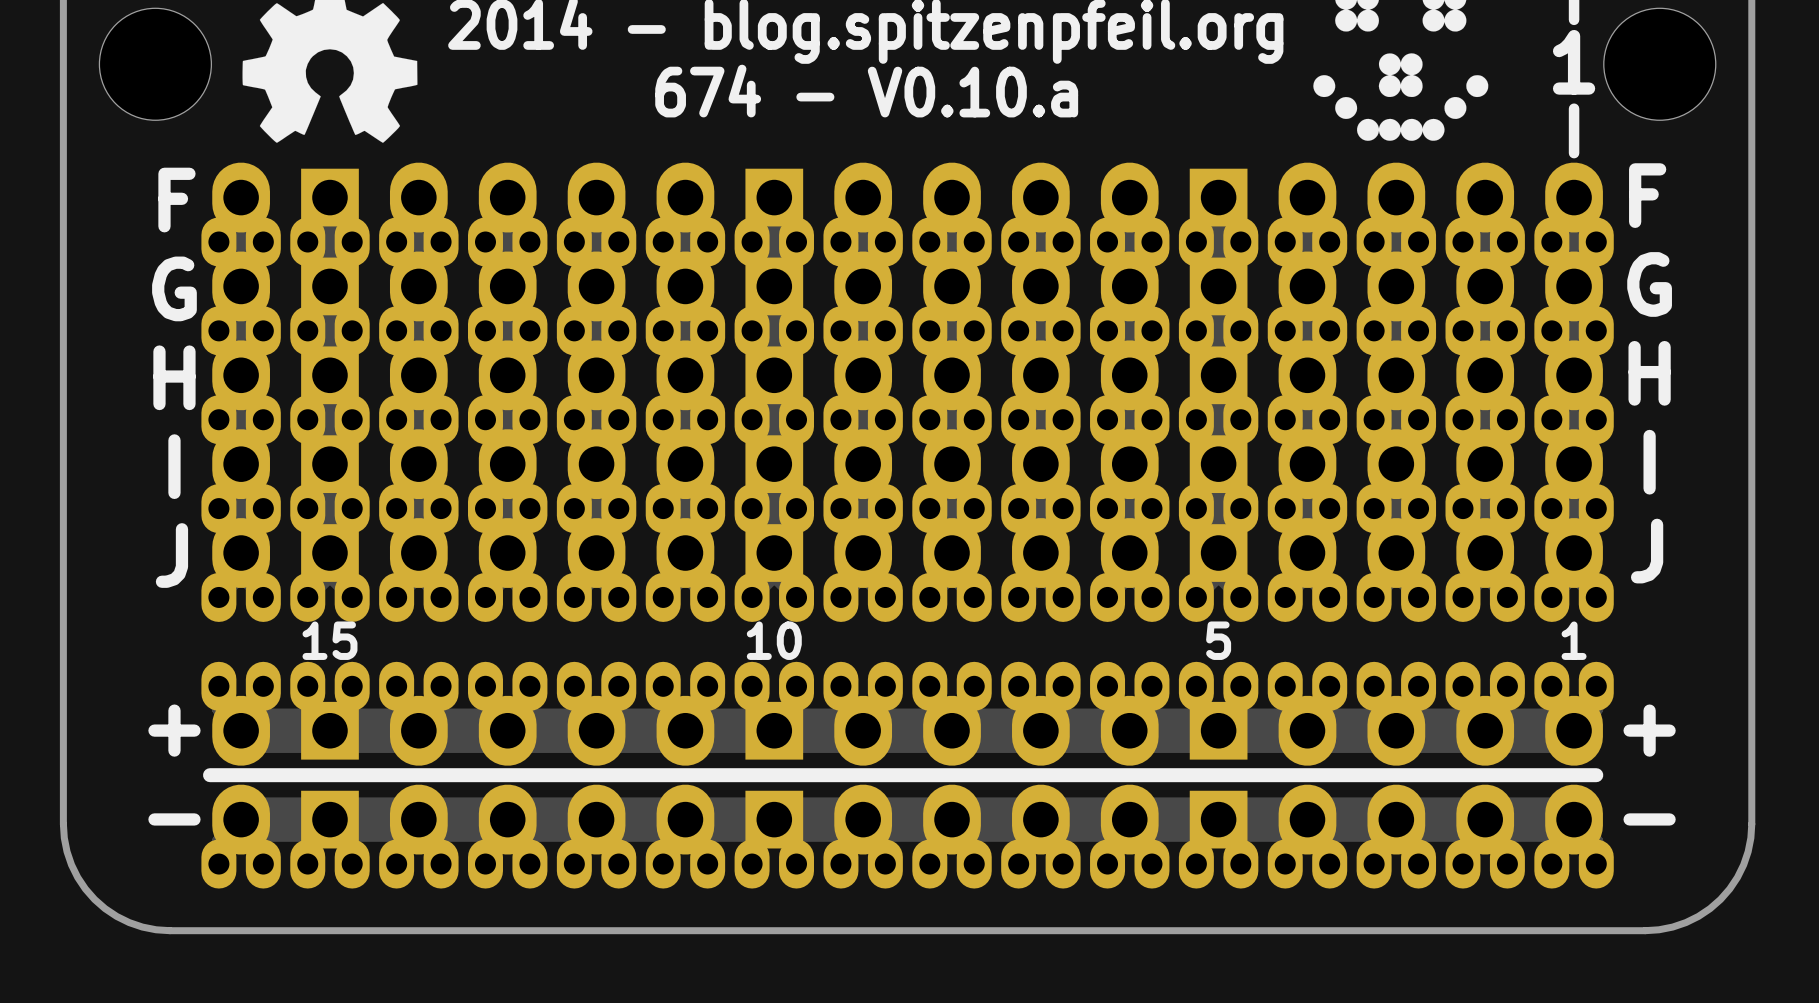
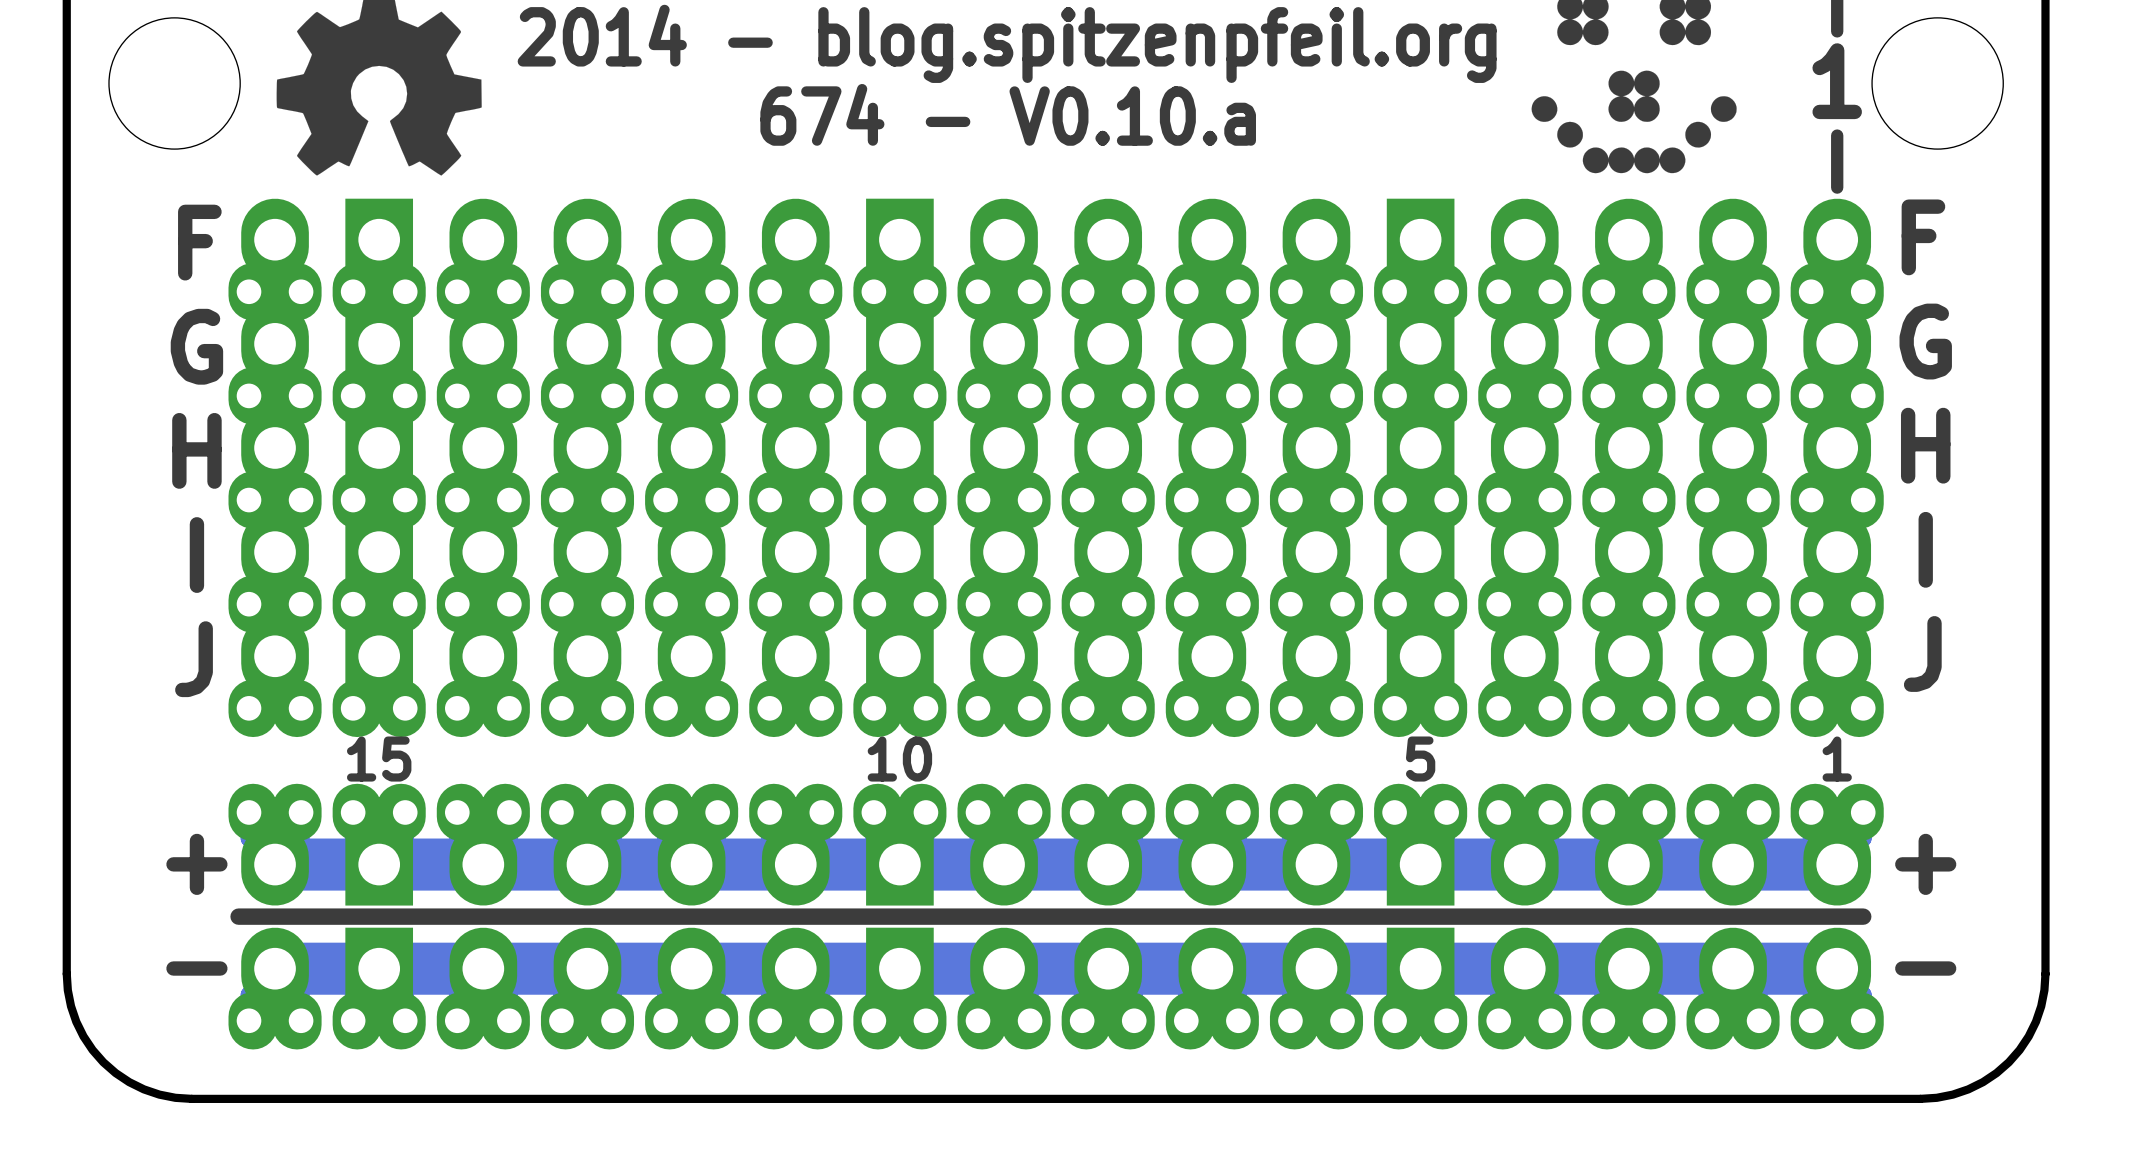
part footprint: [212, 162, 893, 233] -> [241, 198, 1038, 281]
part footprint: [923, 162, 1603, 233] -> [1074, 198, 1872, 281]
part footprint: [201, 217, 548, 267] -> [228, 263, 635, 321]
part footprint: [556, 217, 903, 267] -> [645, 263, 1051, 321]
part footprint: [912, 217, 1259, 267] -> [1061, 263, 1468, 321]
part footprint: [1267, 217, 1614, 267] -> [1478, 263, 1884, 321]
part footprint: [212, 251, 893, 322] -> [241, 302, 1038, 385]
part footprint: [923, 251, 1603, 322] -> [1074, 302, 1872, 385]
part footprint: [201, 306, 548, 356] -> [228, 367, 635, 425]
part footprint: [556, 306, 903, 356] -> [645, 367, 1051, 425]
part footprint: [912, 306, 1259, 356] -> [1061, 367, 1468, 425]
part footprint: [1267, 306, 1614, 356] -> [1478, 367, 1884, 425]
part footprint: [212, 340, 893, 411] -> [241, 406, 1038, 489]
part footprint: [923, 340, 1603, 411] -> [1074, 406, 1872, 489]
part footprint: [201, 395, 548, 445] -> [228, 471, 635, 529]
part footprint: [556, 395, 903, 445] -> [645, 471, 1051, 529]
part footprint: [912, 395, 1259, 445] -> [1061, 471, 1468, 529]
part footprint: [1267, 395, 1614, 445] -> [1478, 471, 1884, 529]
part footprint: [212, 429, 893, 500] -> [241, 511, 1038, 594]
part footprint: [923, 429, 1603, 500] -> [1074, 511, 1872, 594]
part footprint: [201, 484, 548, 534] -> [228, 575, 635, 633]
part footprint: [556, 484, 903, 534] -> [645, 575, 1051, 633]
part footprint: [912, 484, 1259, 534] -> [1061, 575, 1468, 633]
part footprint: [1267, 484, 1614, 534] -> [1478, 575, 1884, 633]
part footprint: [212, 518, 893, 589] -> [241, 615, 1038, 698]
part footprint: [923, 518, 1603, 589] -> [1074, 615, 1872, 698]
part footprint: [201, 572, 548, 622] -> [228, 679, 635, 738]
part footprint: [556, 572, 903, 622] -> [645, 679, 1051, 738]
part footprint: [912, 572, 1259, 622] -> [1061, 679, 1468, 738]
part footprint: [1267, 572, 1614, 622] -> [1478, 679, 1884, 738]
part footprint: [201, 661, 548, 711] -> [228, 783, 635, 842]
part footprint: [556, 661, 903, 711] -> [645, 783, 1051, 842]
part footprint: [912, 661, 1259, 711] -> [1061, 783, 1468, 842]
part footprint: [1267, 661, 1614, 711] -> [1478, 783, 1884, 842]
part footprint: [212, 695, 893, 766] -> [241, 823, 1038, 906]
part footprint: [923, 695, 1603, 766] -> [1074, 823, 1872, 906]
part footprint: [212, 784, 893, 855] -> [241, 927, 1038, 1010]
part footprint: [923, 784, 1603, 855] -> [1074, 927, 1872, 1010]
part footprint: [201, 839, 548, 889] -> [228, 992, 635, 1050]
part footprint: [556, 839, 903, 889] -> [645, 992, 1051, 1050]
part footprint: [912, 839, 1259, 889] -> [1061, 992, 1468, 1050]
part footprint: [1267, 839, 1614, 889] -> [1478, 992, 1884, 1050]

